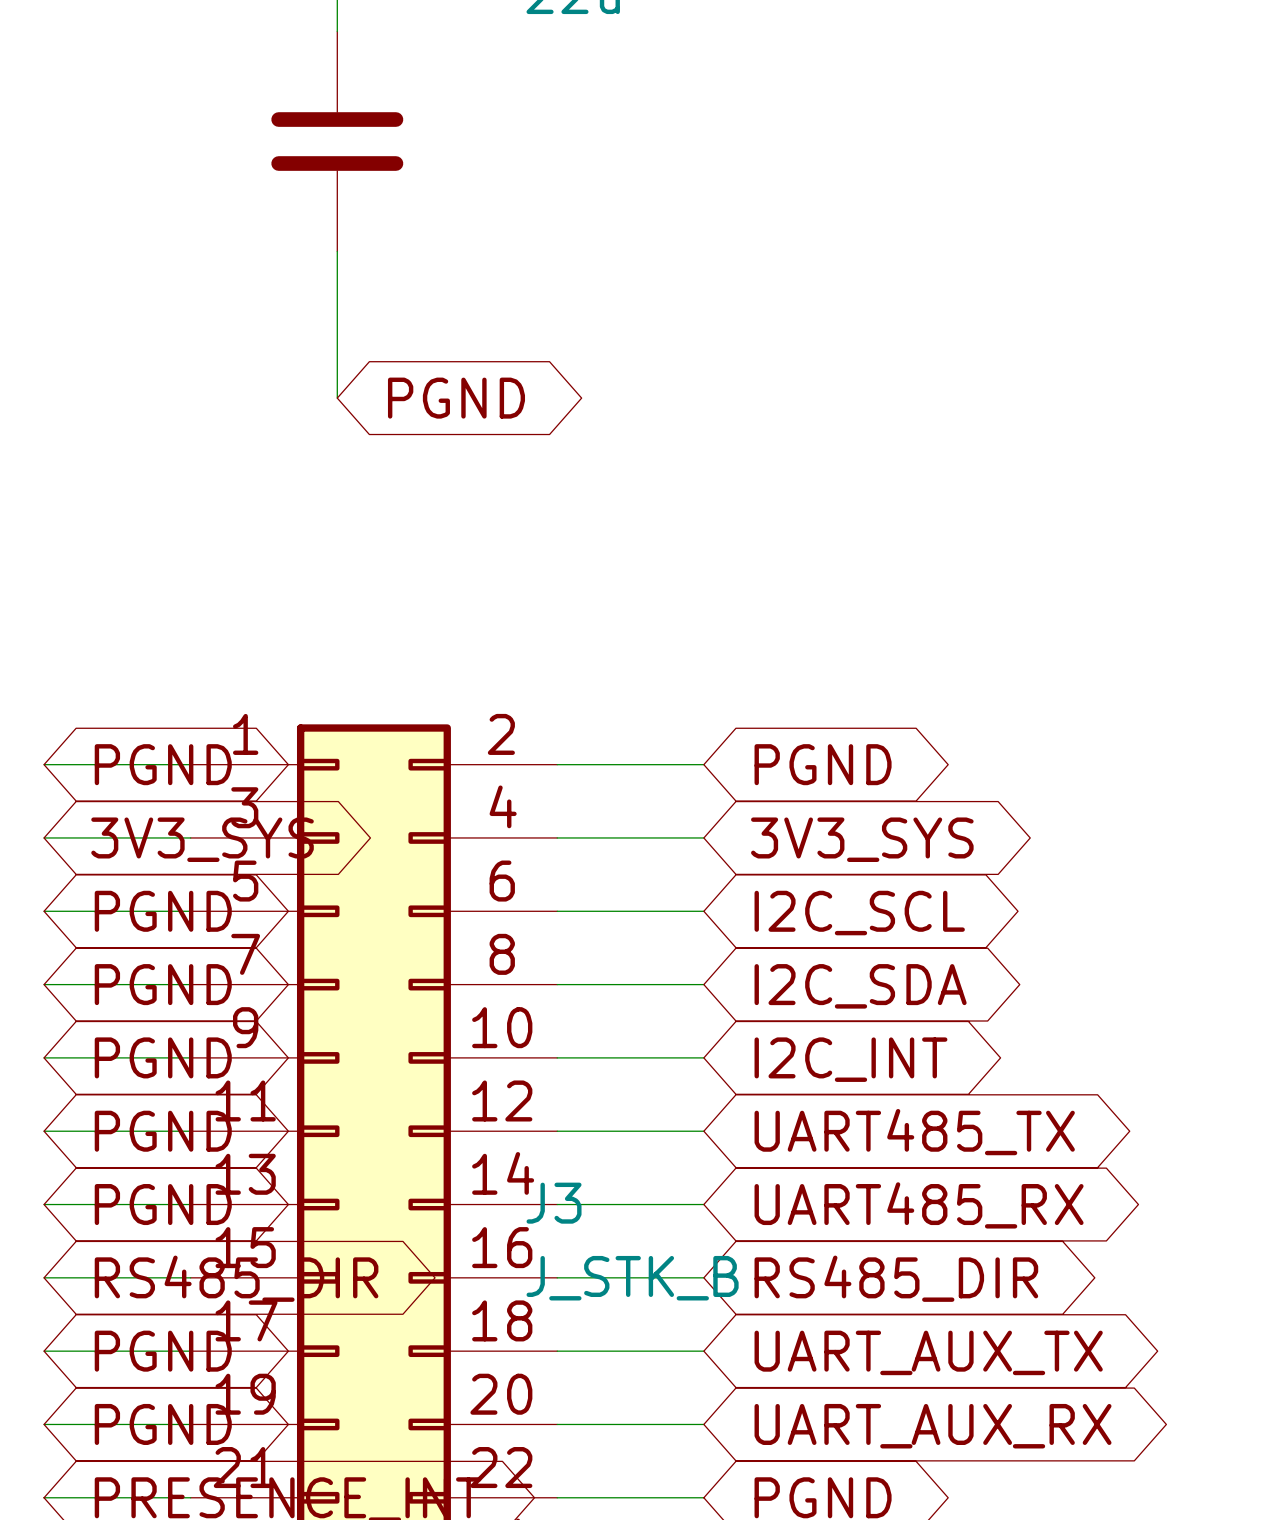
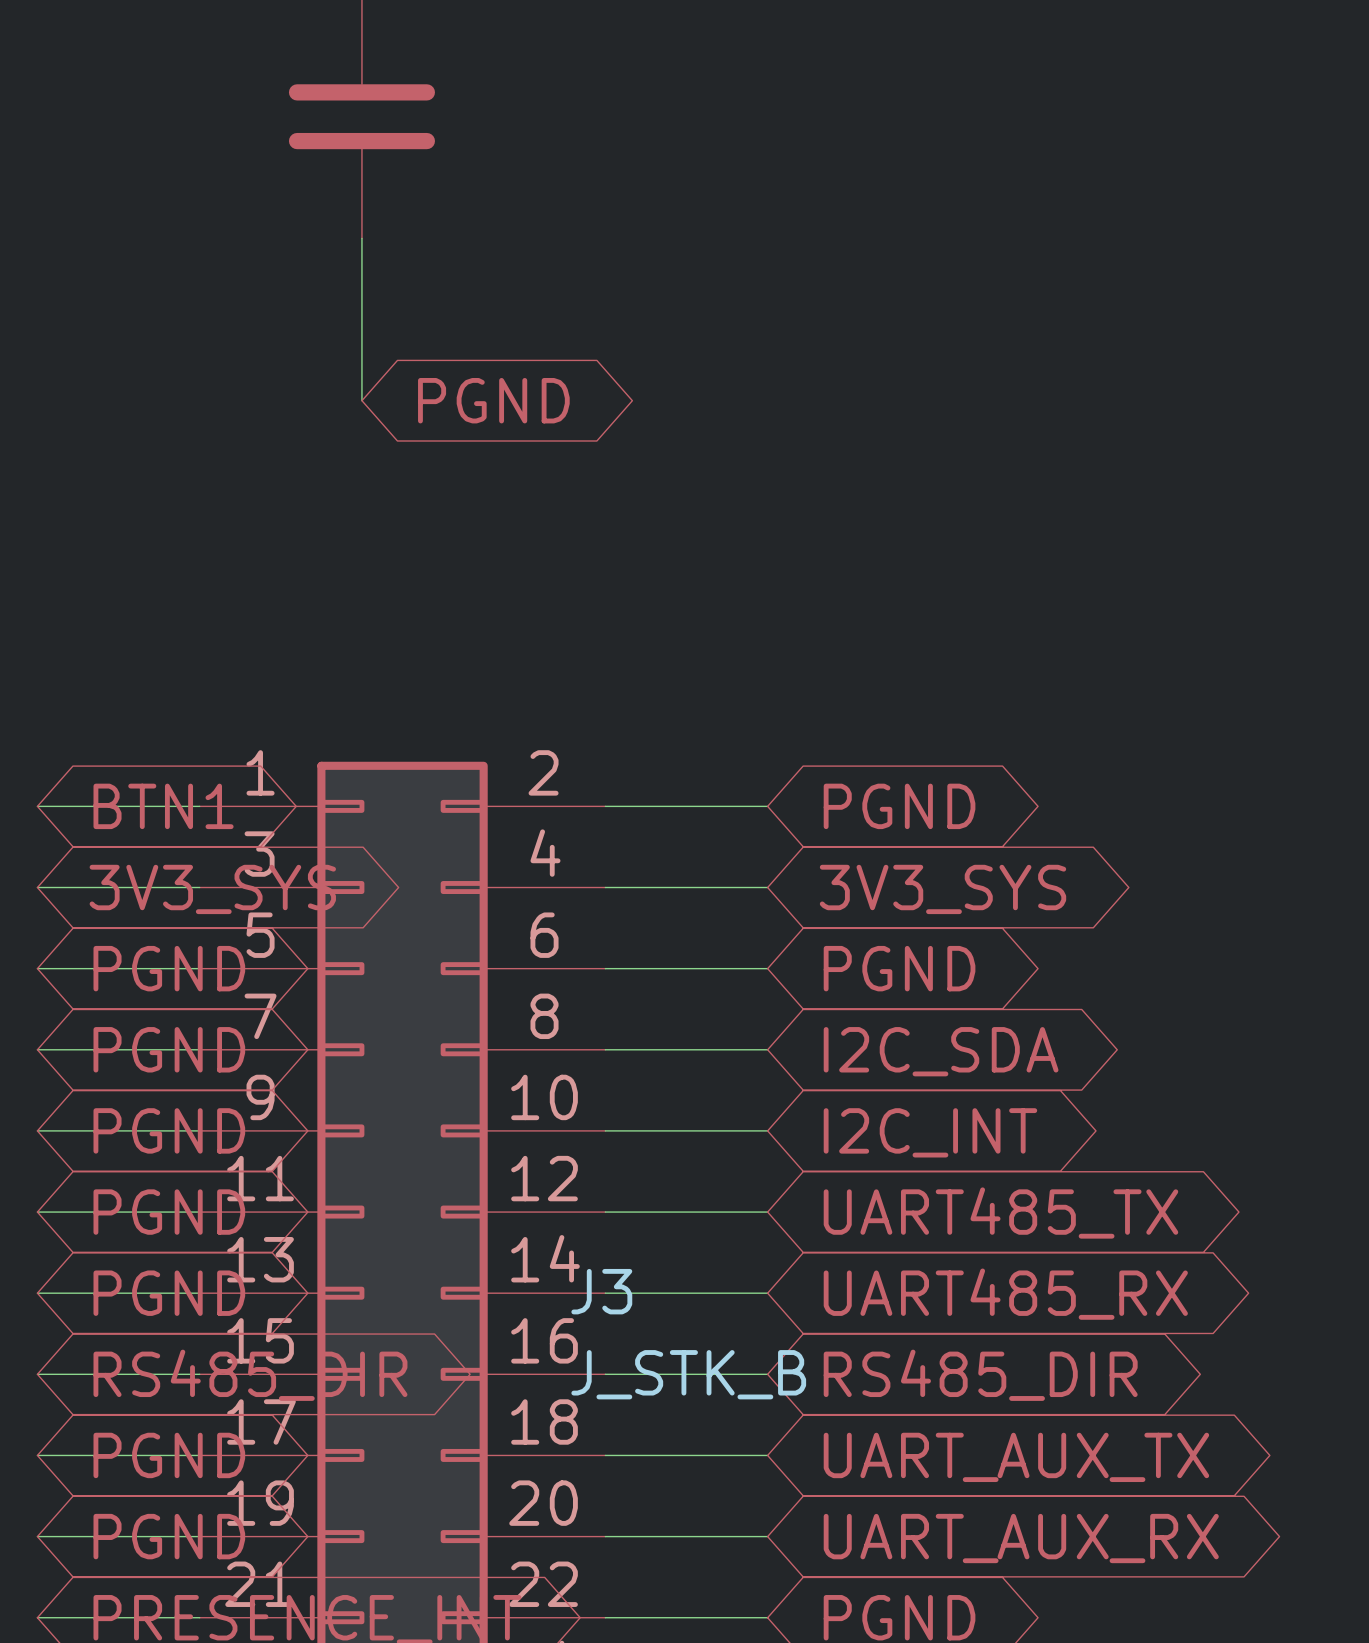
global label: PGND (163, 764) -> BTN1 (163, 806)
global label: I2C_SCL (859, 913) -> PGND (899, 968)

